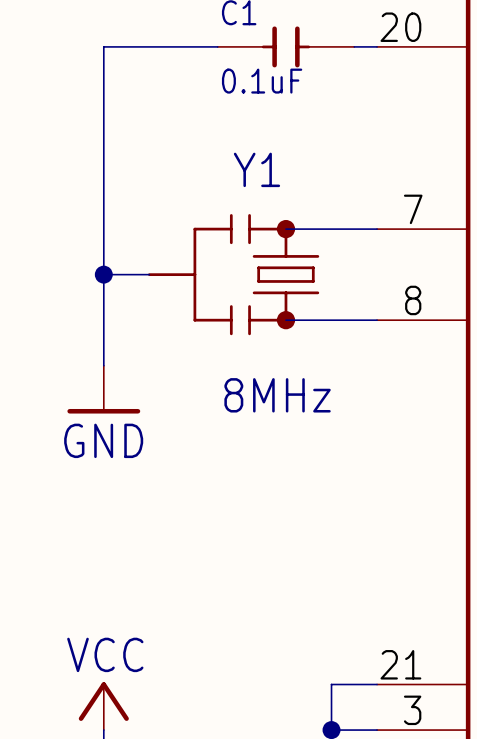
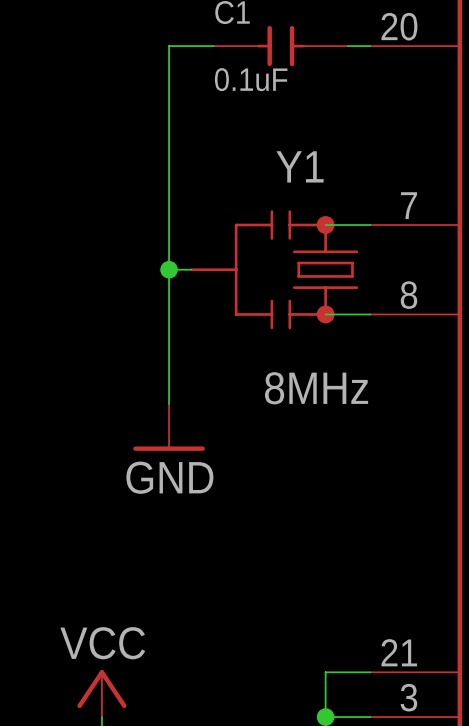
wire: (172, 46) (103, 46) (103, 365) -> (169, 46) (169, 403)
wire: (103, 274) (149, 274) -> none
junction position: (103, 274) -> (169, 269)
Y1 position: (233, 274) -> (274, 269)
power symbol position: GND (103, 389) -> GND (169, 427)

